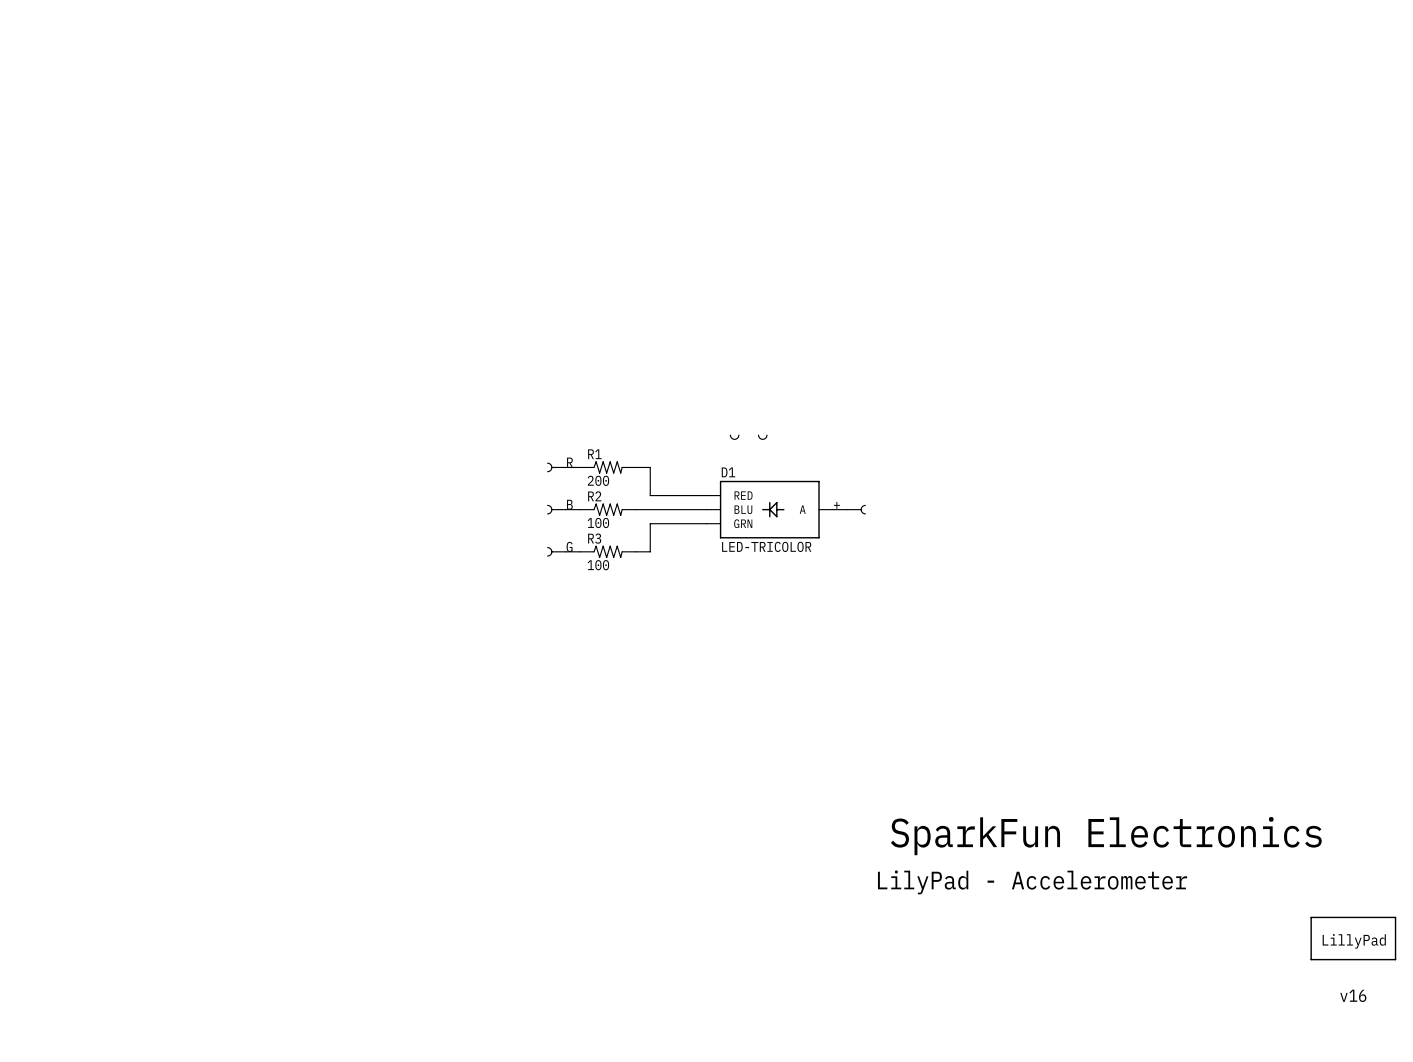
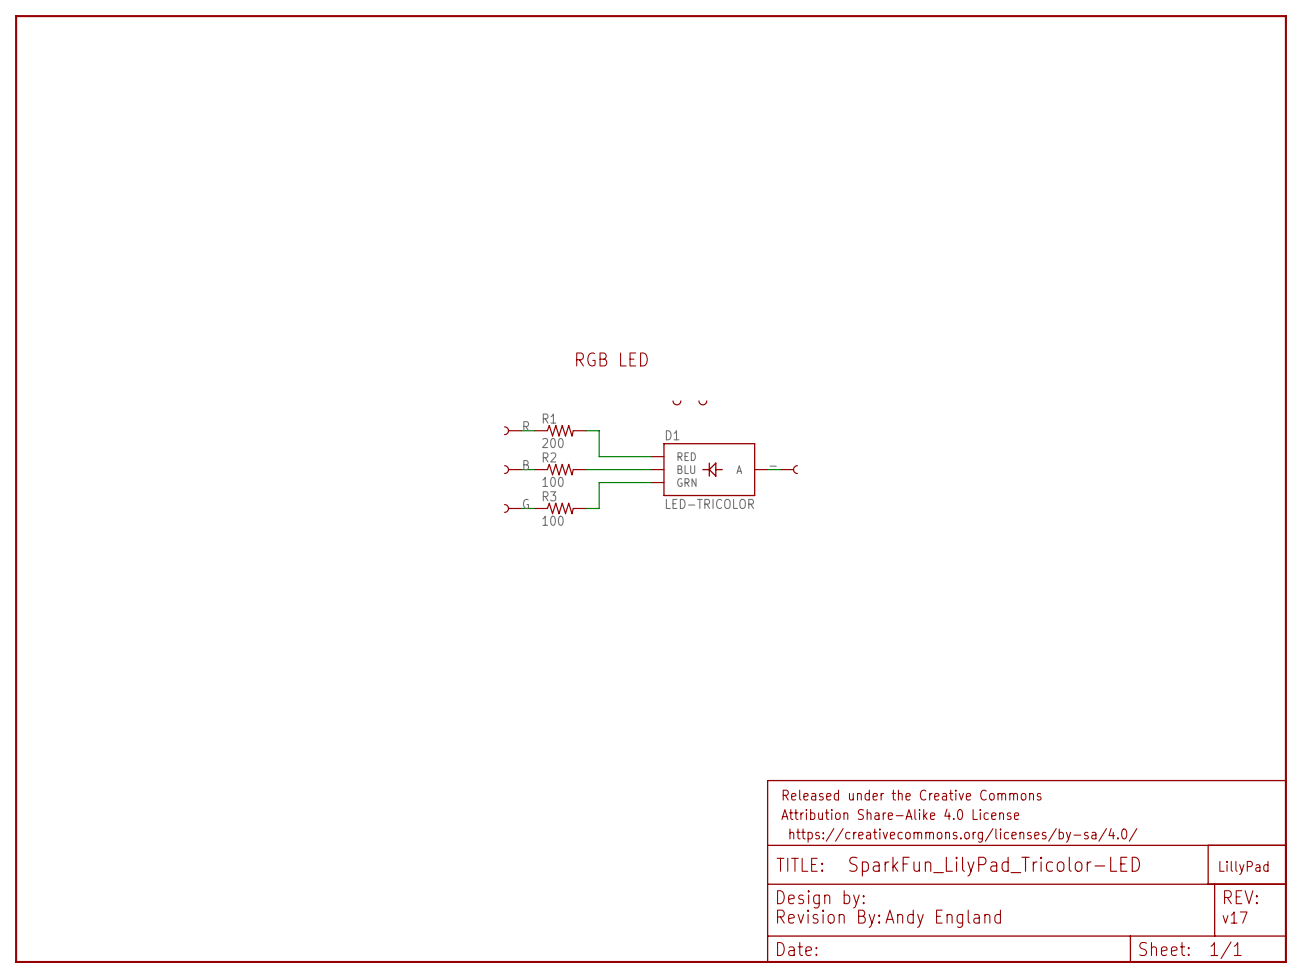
text: none -> RGB LED (611, 359)
label: + (836, 505) -> - (773, 466)
part: none -> (651, 489)
text: SparkFun Electronics (1106, 836) -> none
text: LilyPad - Accelerometer (1032, 882) -> none
part: none -> (1026, 871)
text: v16 (1353, 995) -> v17 (1235, 917)
part: none -> (828, 918)
text: none -> Andy England (943, 918)

